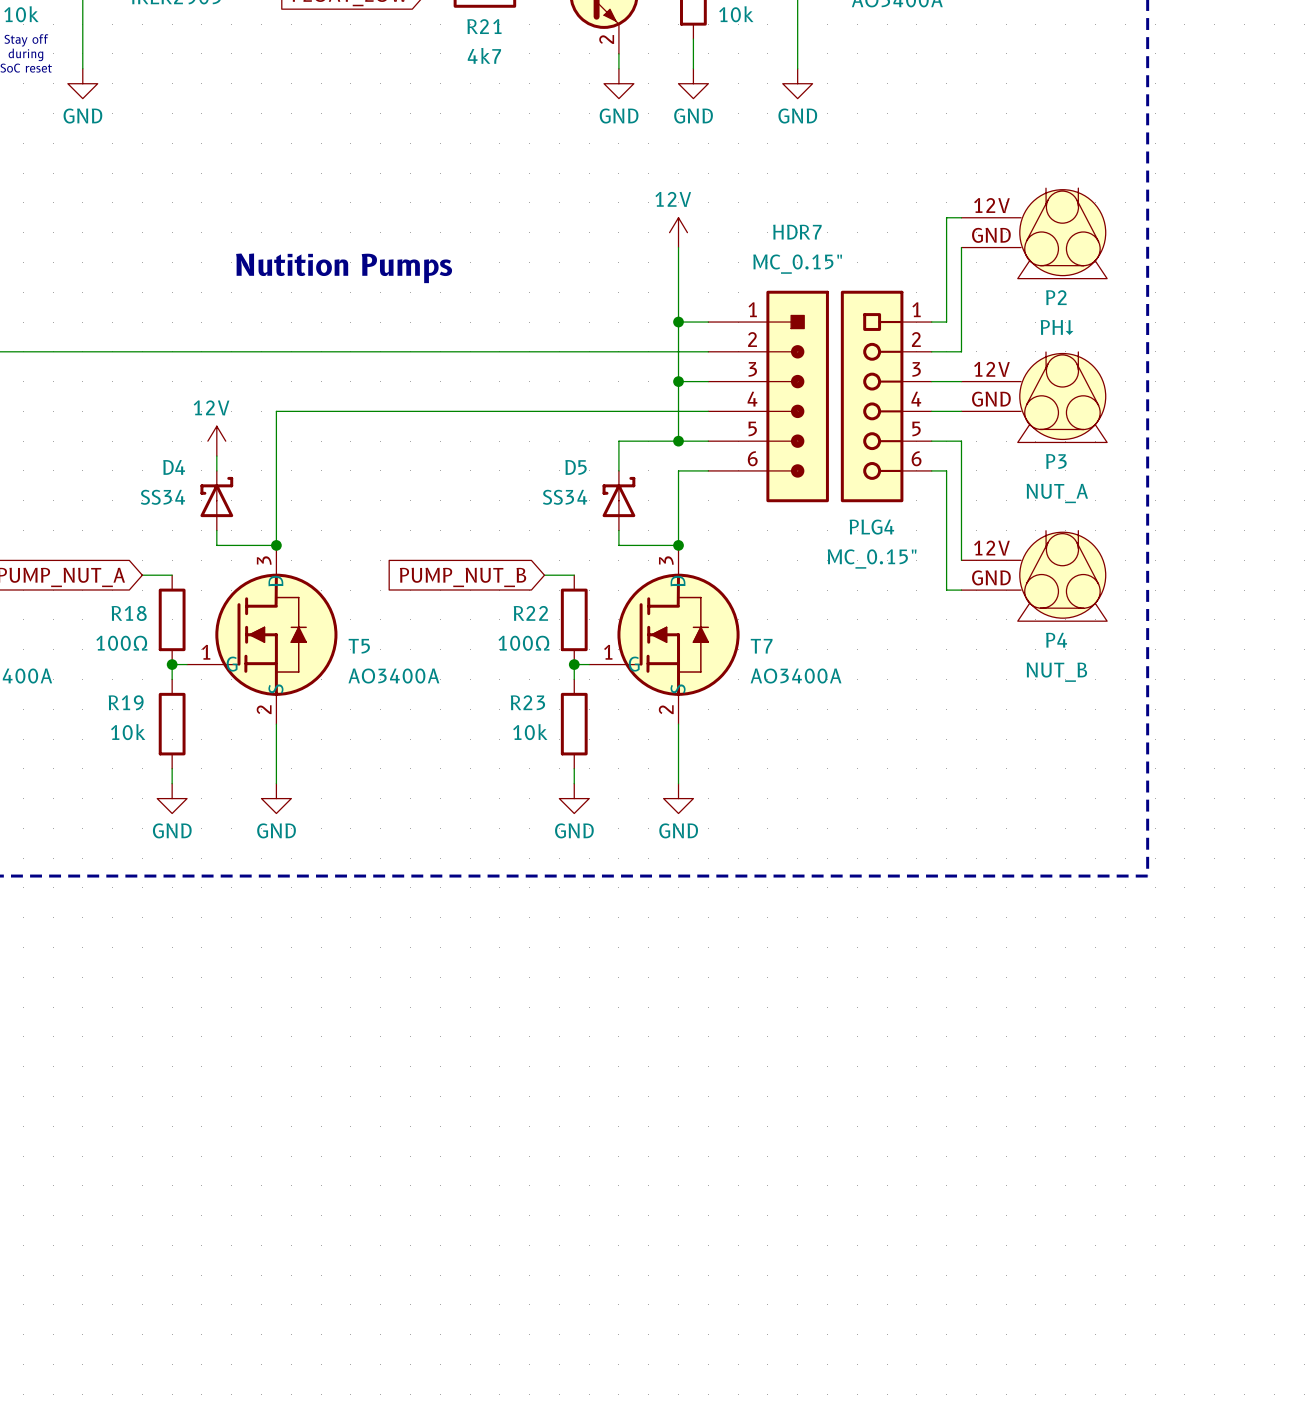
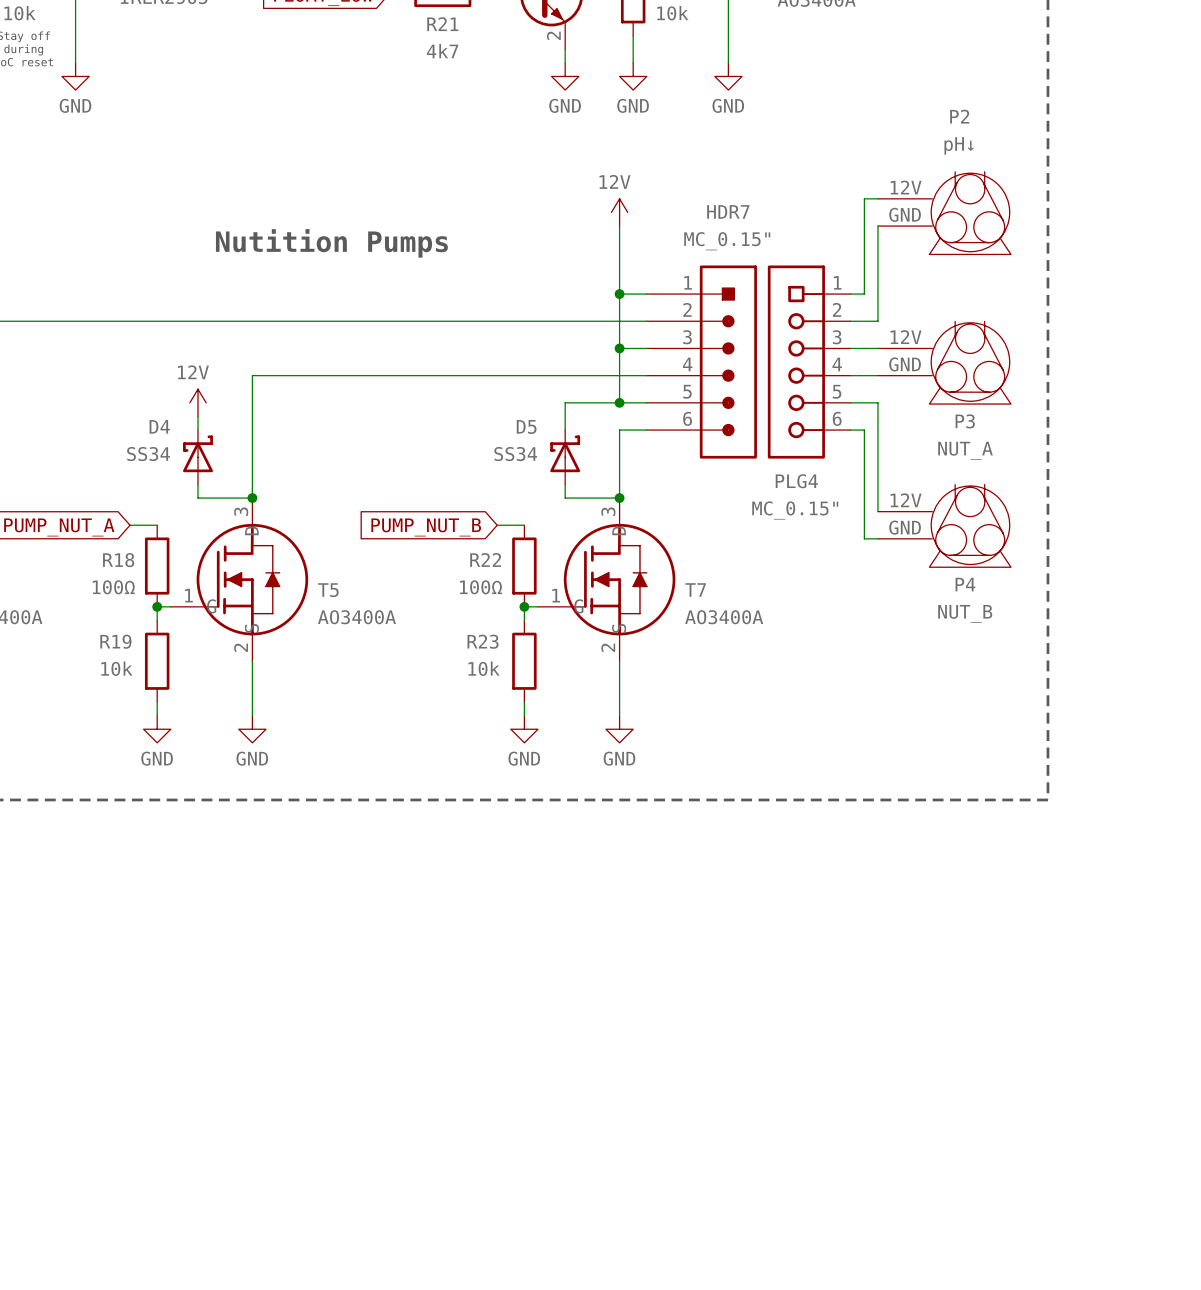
P2 name position: P2 (1056, 297) -> P2 (959, 116)
P2 value: PH↓ (1057, 327) -> pH↓ (959, 145)

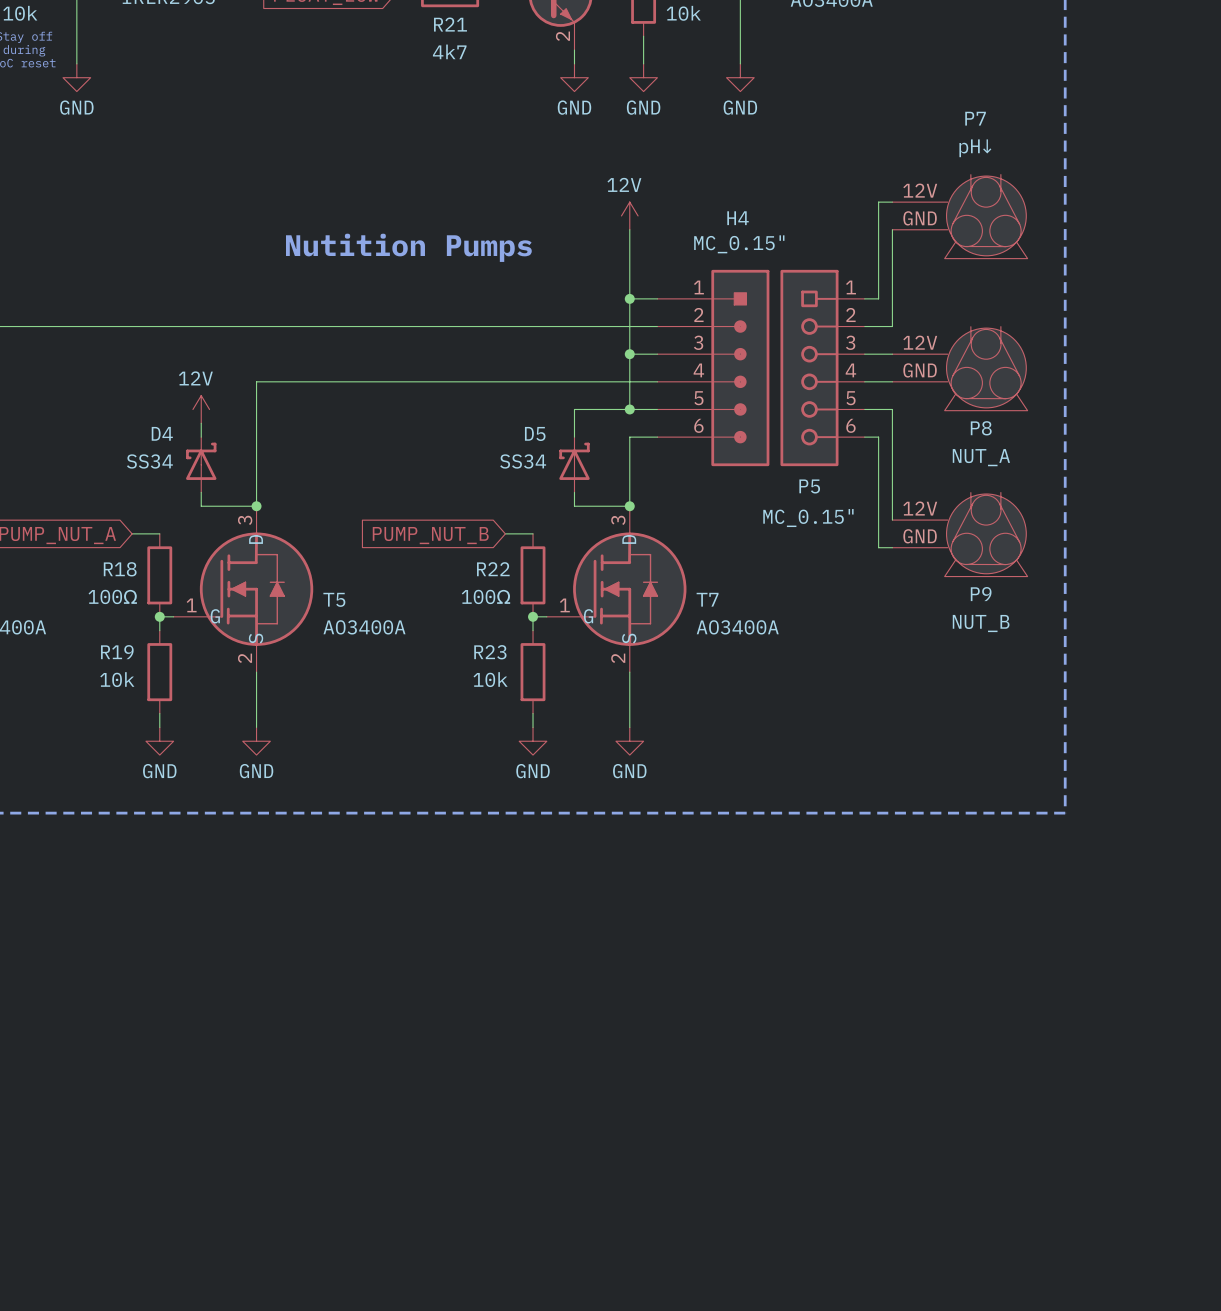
P2 name: P2 (959, 116) -> P7 (975, 118)
HDR7 name: HDR7 (728, 211) -> H4 (738, 218)
text position: Nutition Pumps (331, 243) -> Nutition Pumps (408, 247)
P3 name: P3 (965, 421) -> P8 (981, 428)
PLG4 name: PLG4 (796, 481) -> P5 (809, 486)
P4 name: P4 (965, 584) -> P9 (981, 594)

